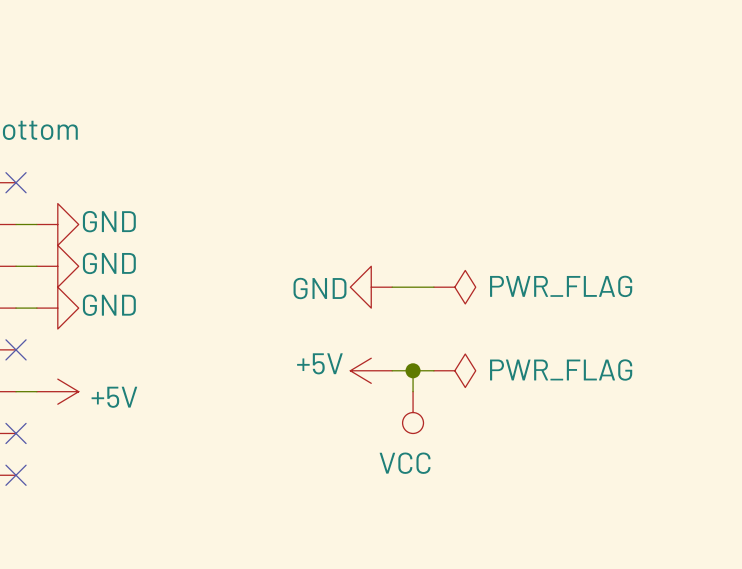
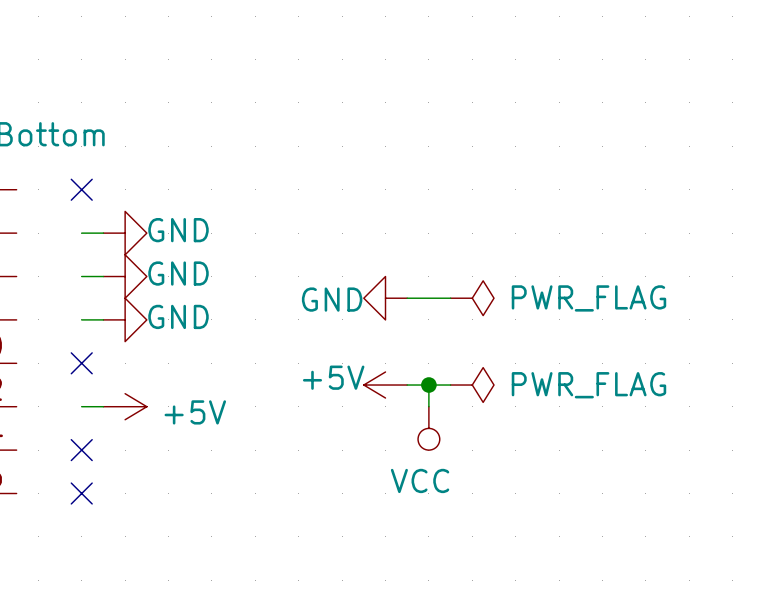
no-connect mark position: (16, 182) -> (81, 189)
wire: (16, 224) (36, 224) -> (81, 233) (103, 233)
power symbol: GND (57, 224) -> none
power symbol: none -> GND (125, 233)
wire: (16, 266) (36, 266) -> (81, 276) (103, 276)
power symbol: GND (57, 266) -> none
power symbol: none -> GND (125, 276)
wire: (16, 308) (36, 308) -> (81, 319) (103, 319)
power symbol: GND (57, 308) -> none
power symbol: none -> GND (125, 319)
no-connect mark: (16, 349) -> none
no-connect mark: none -> (81, 363)
wire: (16, 391) (36, 391) -> (81, 406) (103, 406)
power symbol position: +5V (57, 391) -> +5V (125, 406)
no-connect mark: (16, 433) -> none
no-connect mark: none -> (81, 450)
no-connect mark: (16, 475) -> none
no-connect mark: none -> (81, 493)

